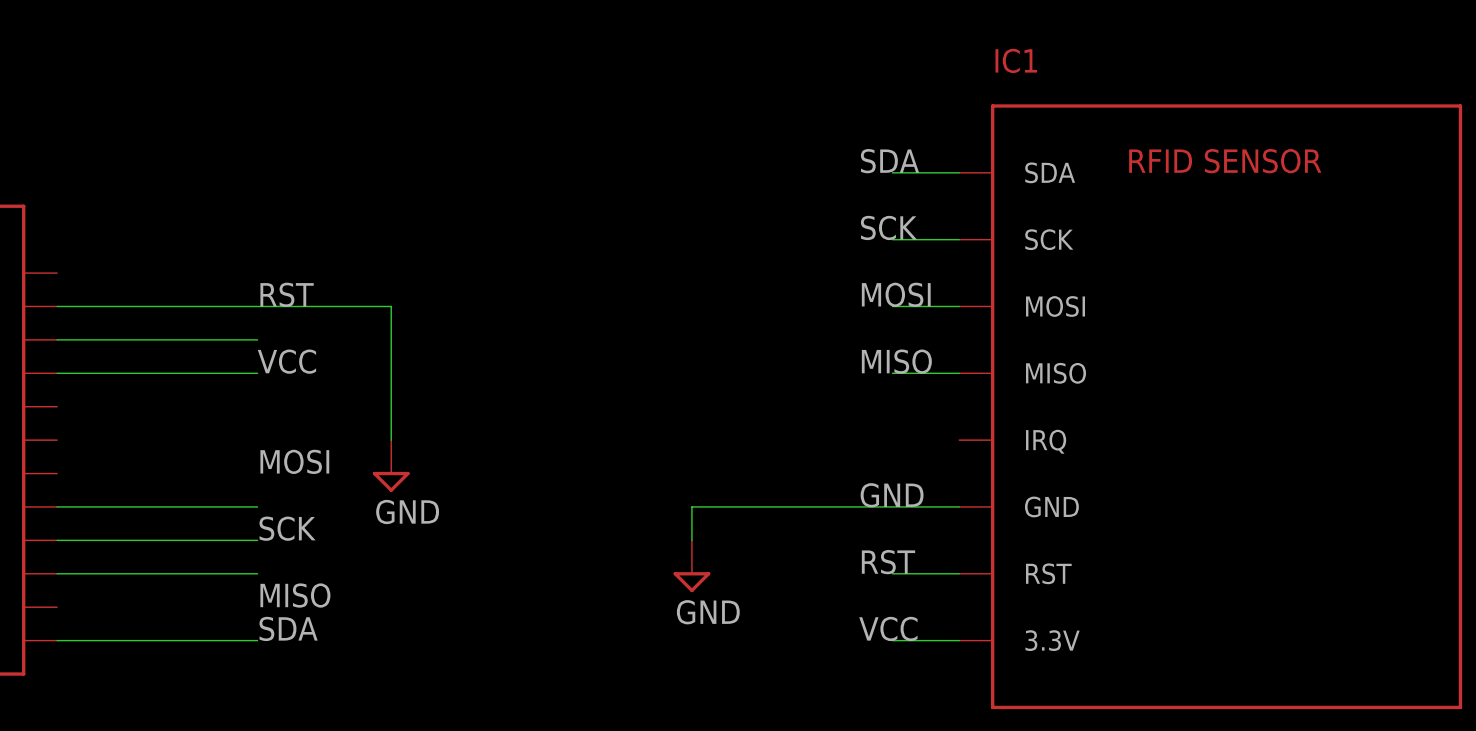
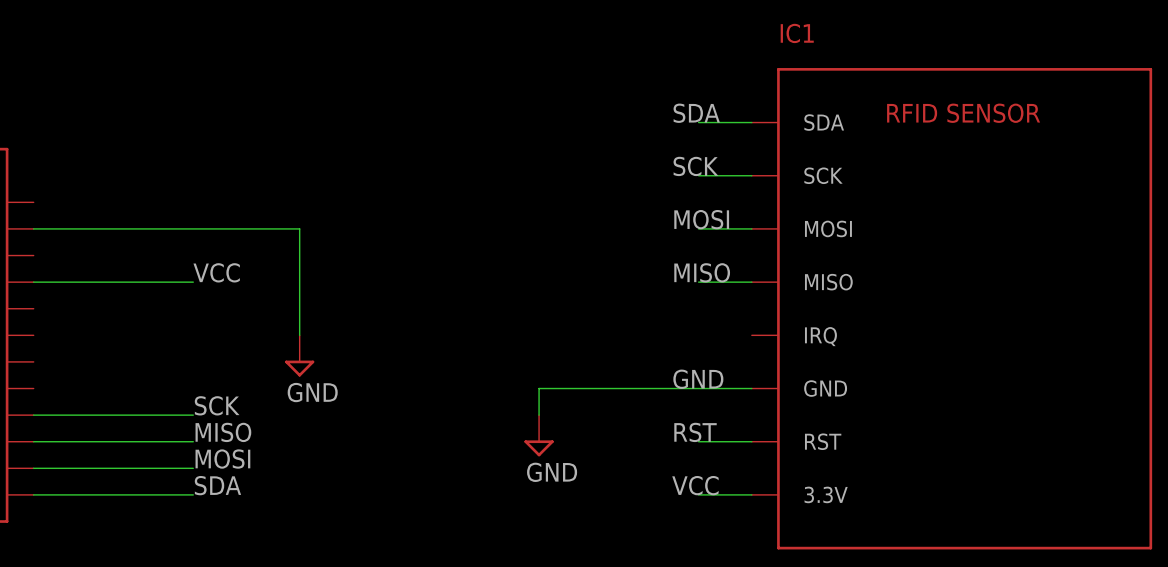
label: RST (287, 294) -> none
wire: (57, 339) (257, 339) -> none
label: MOSI (294, 461) -> none
wire: (57, 506) (257, 506) -> (33, 468) (193, 468)
label: none -> MISO (223, 432)
label: MISO (295, 595) -> MOSI (222, 459)

